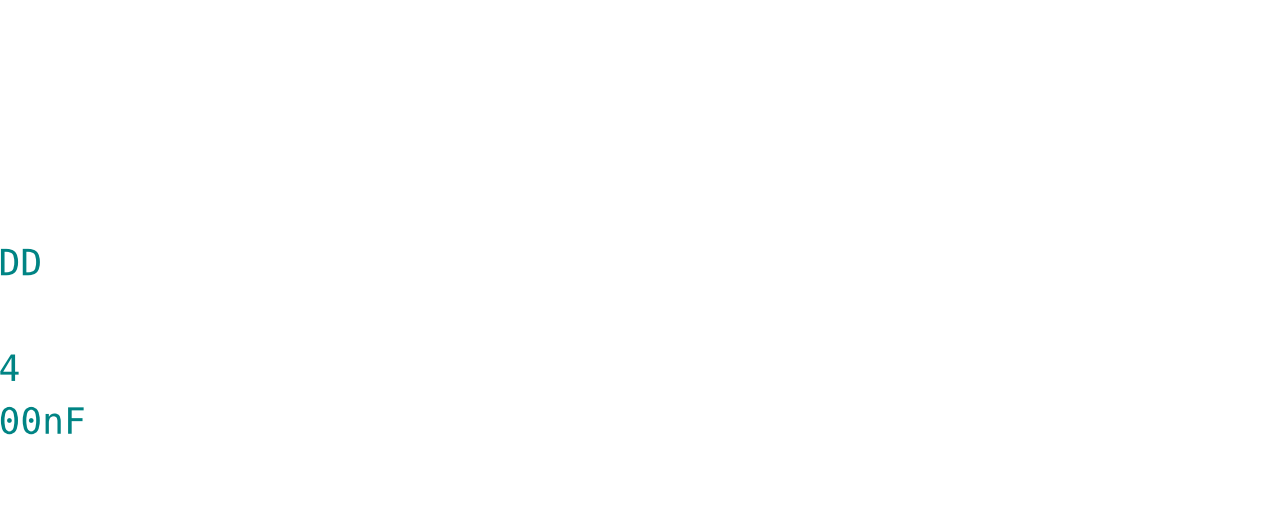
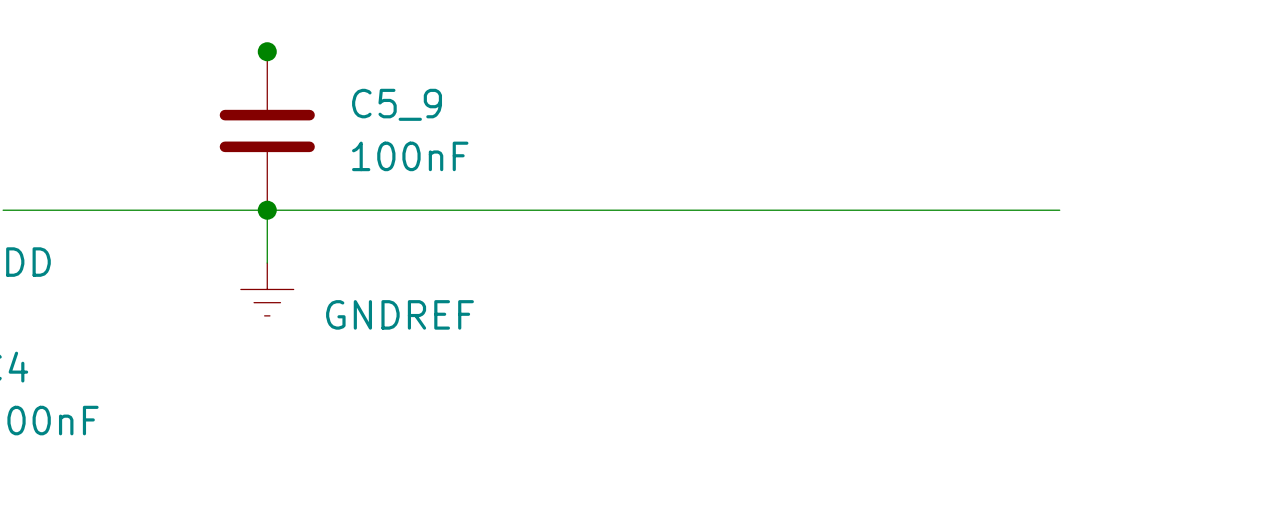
junction: none -> (267, 51)
C5_9: none -> 100nF (267, 130)
wire: none -> (3, 210) (1059, 210)
wire: none -> (267, 210) (267, 263)
junction: none -> (267, 210)
power symbol: none -> GNDREF (267, 289)

